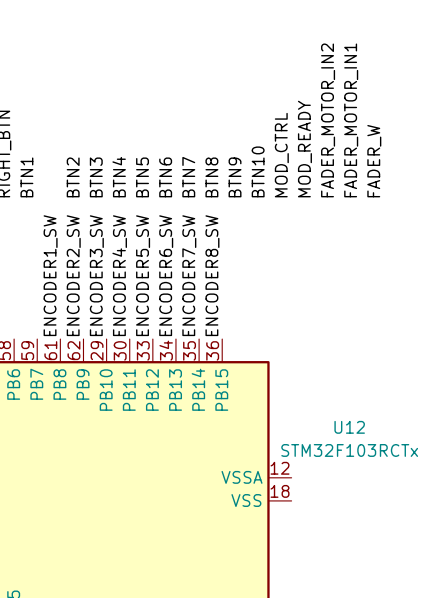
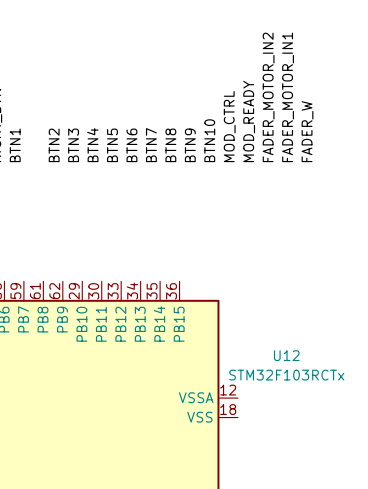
label: ENCODER1_SW (50, 275) -> none
label: ENCODER2_SW (73, 275) -> none
label: ENCODER3_SW (96, 275) -> none
label: ENCODER4_SW (119, 275) -> none
label: ENCODER5_SW (143, 275) -> none
label: ENCODER6_SW (166, 275) -> none
label: ENCODER7_SW (189, 275) -> none
label: ENCODER8_SW (212, 275) -> none

